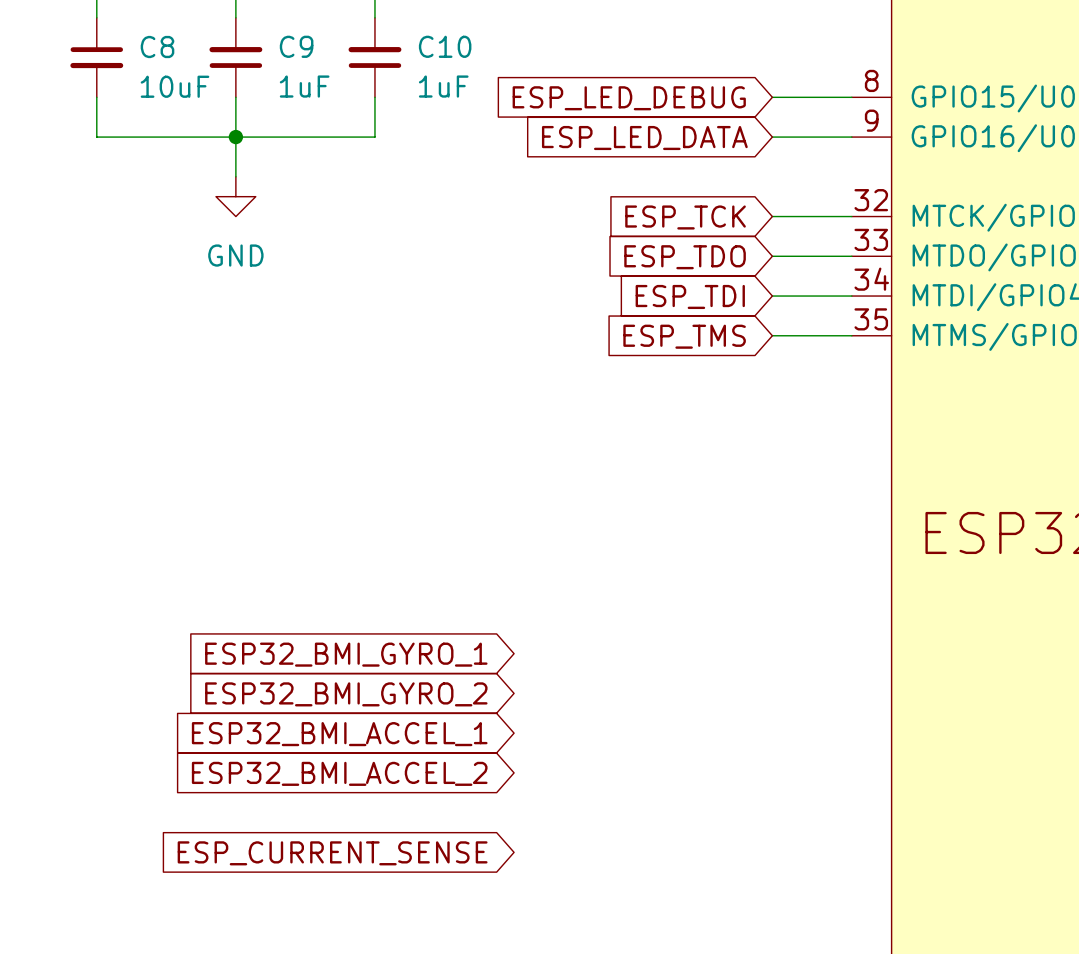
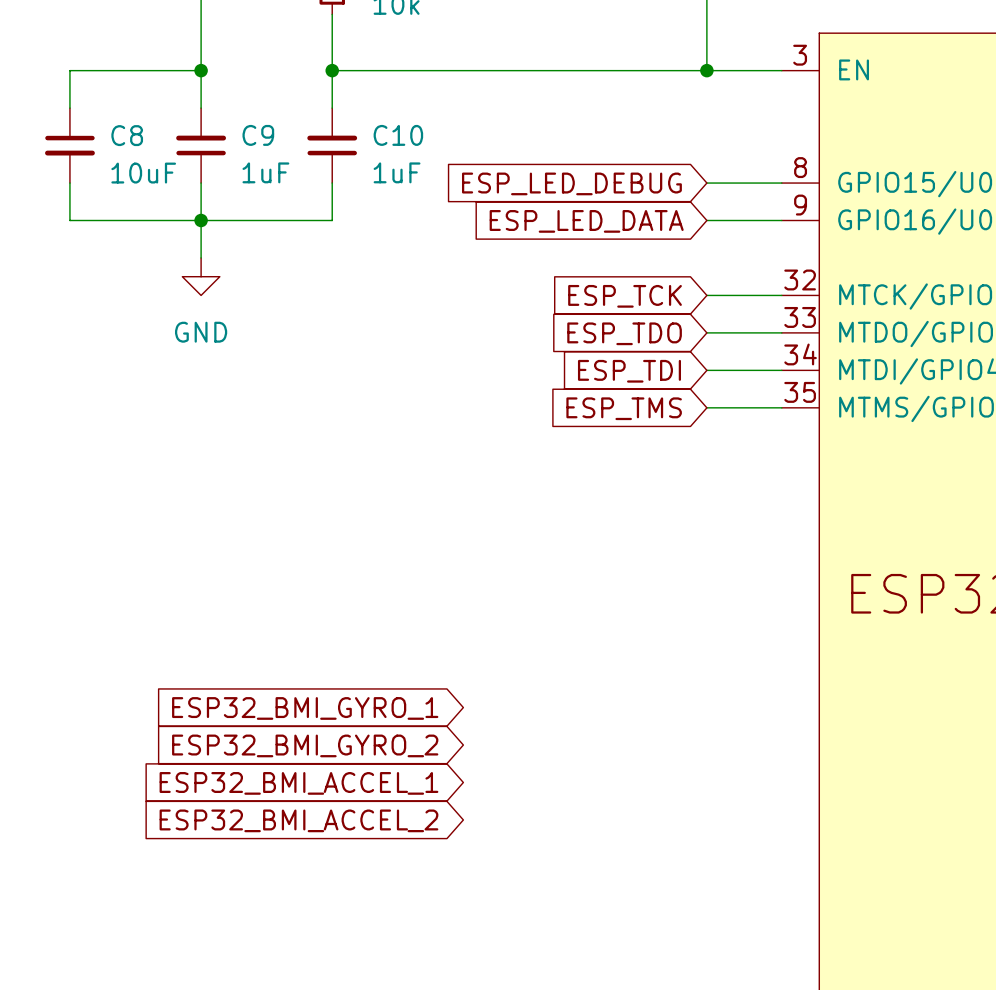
global label: ESP_CURRENT_SENSE (332, 853) -> none

